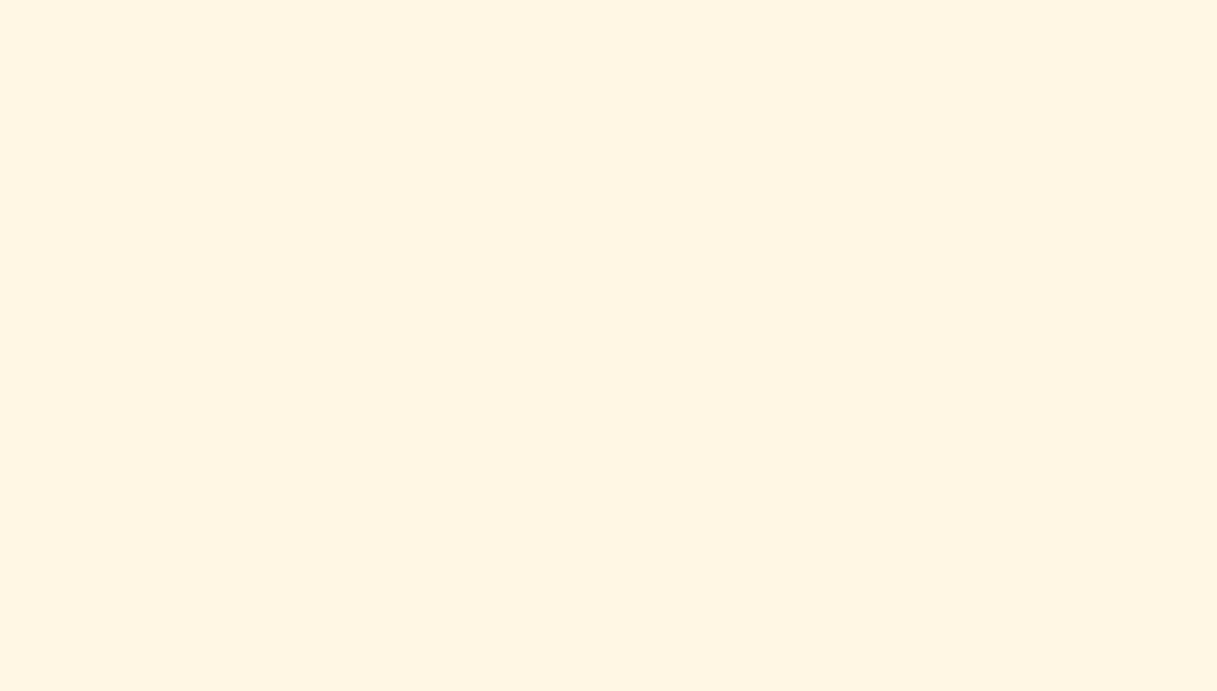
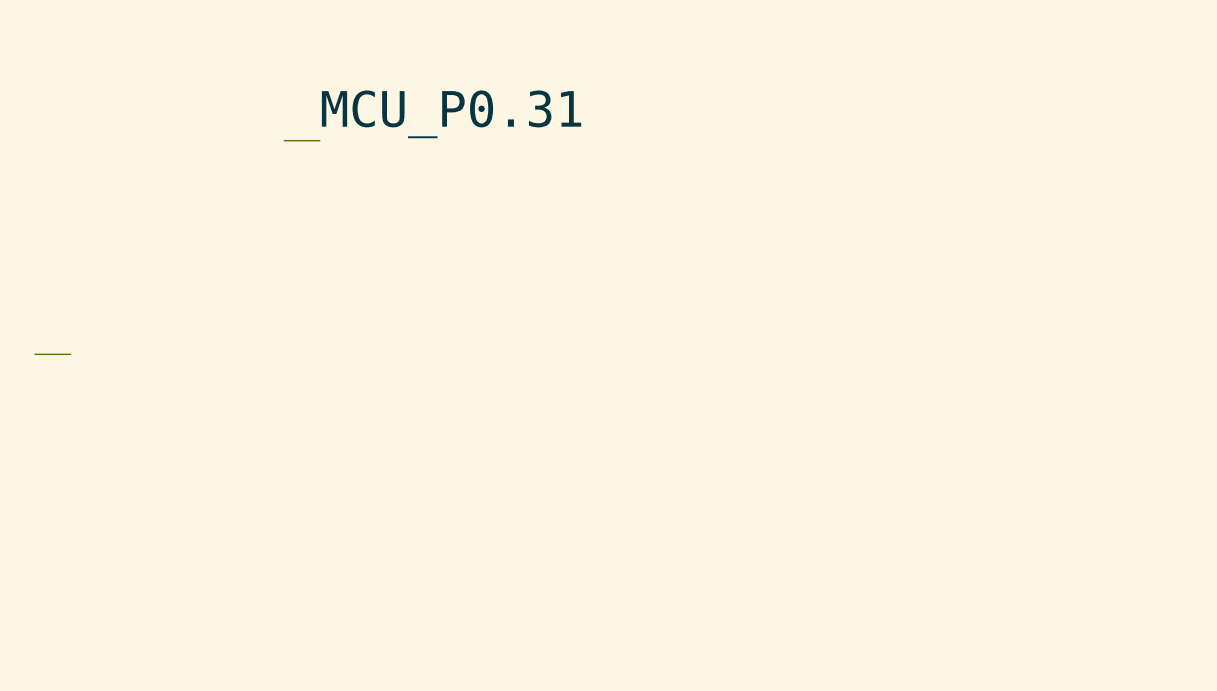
label: none -> MCU_P0.31 (451, 114)
wire: none -> (284, 140) (319, 140)
wire: none -> (34, 354) (70, 354)

